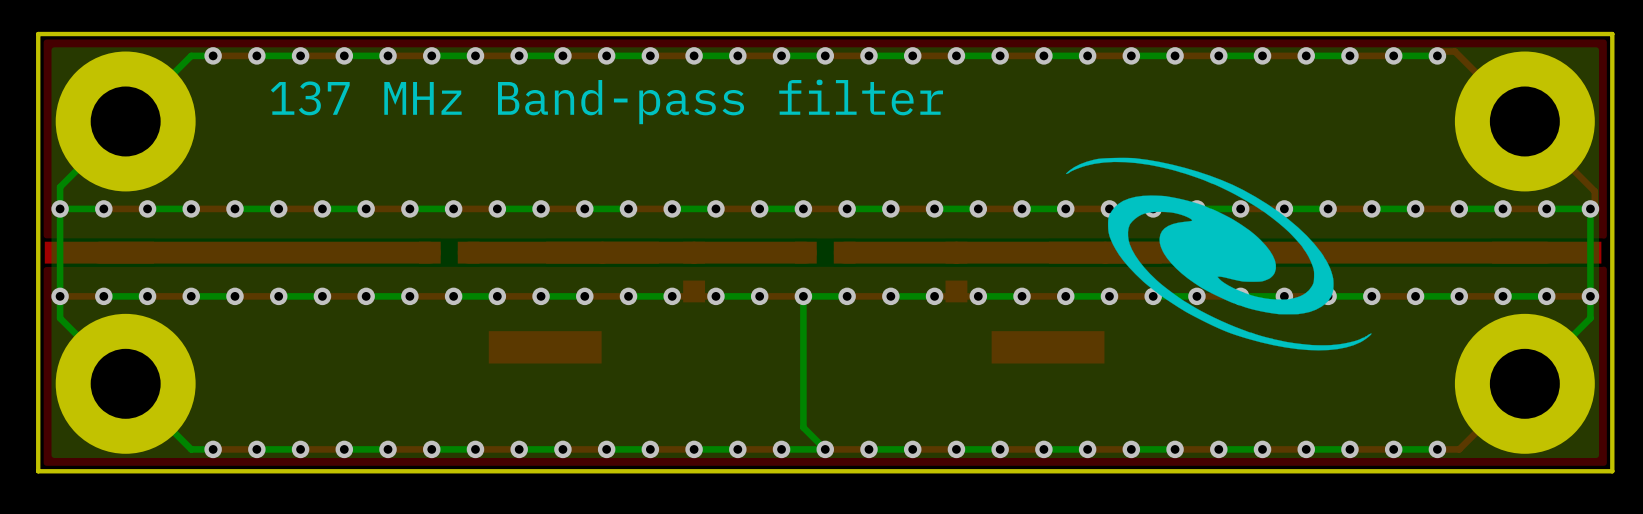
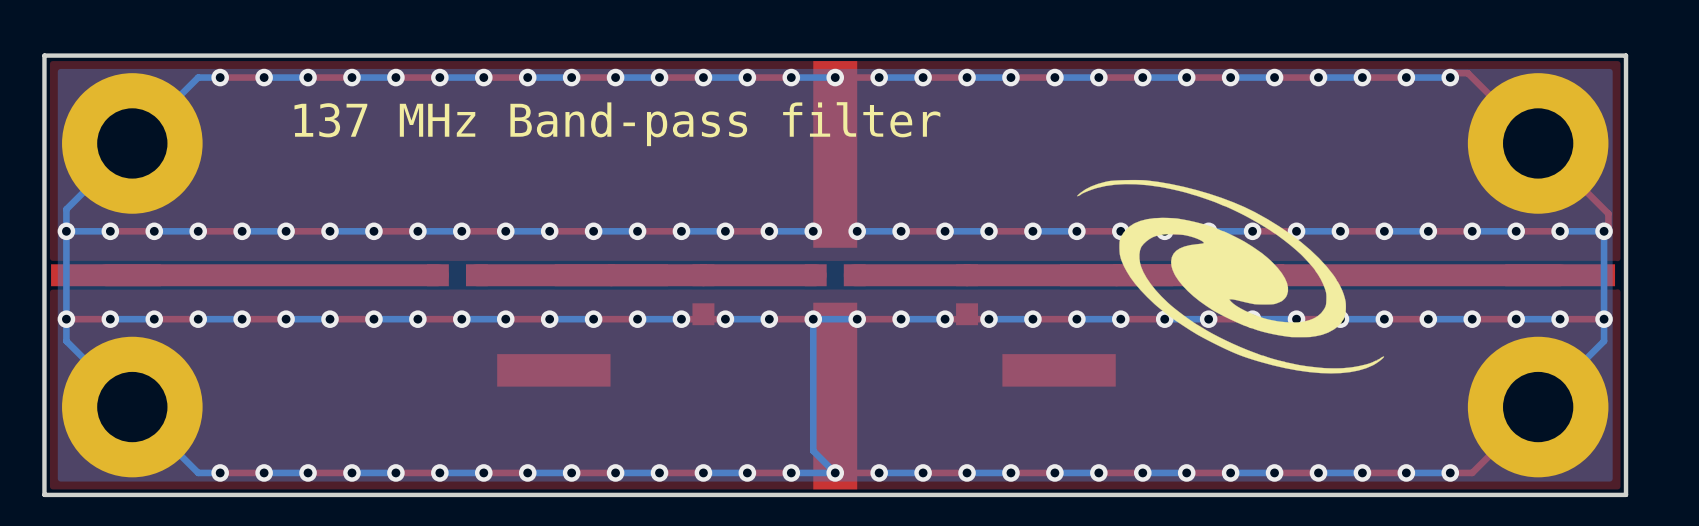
part: none -> (835, 154)
part: none -> (835, 396)

